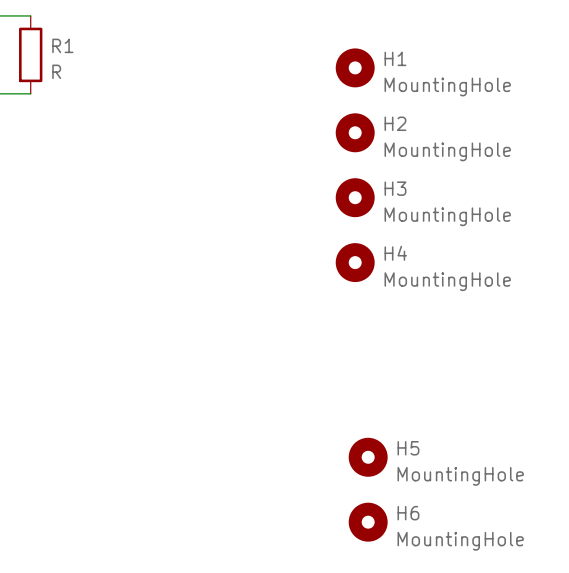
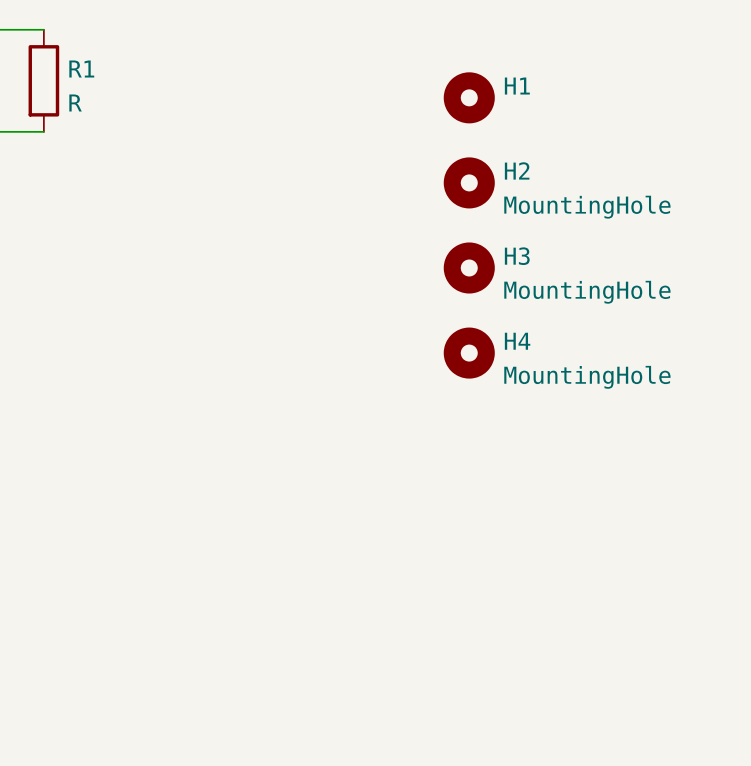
H1 value: MountingHole (447, 86) -> none
H5: MountingHole (368, 457) -> none
H6: MountingHole (368, 522) -> none

